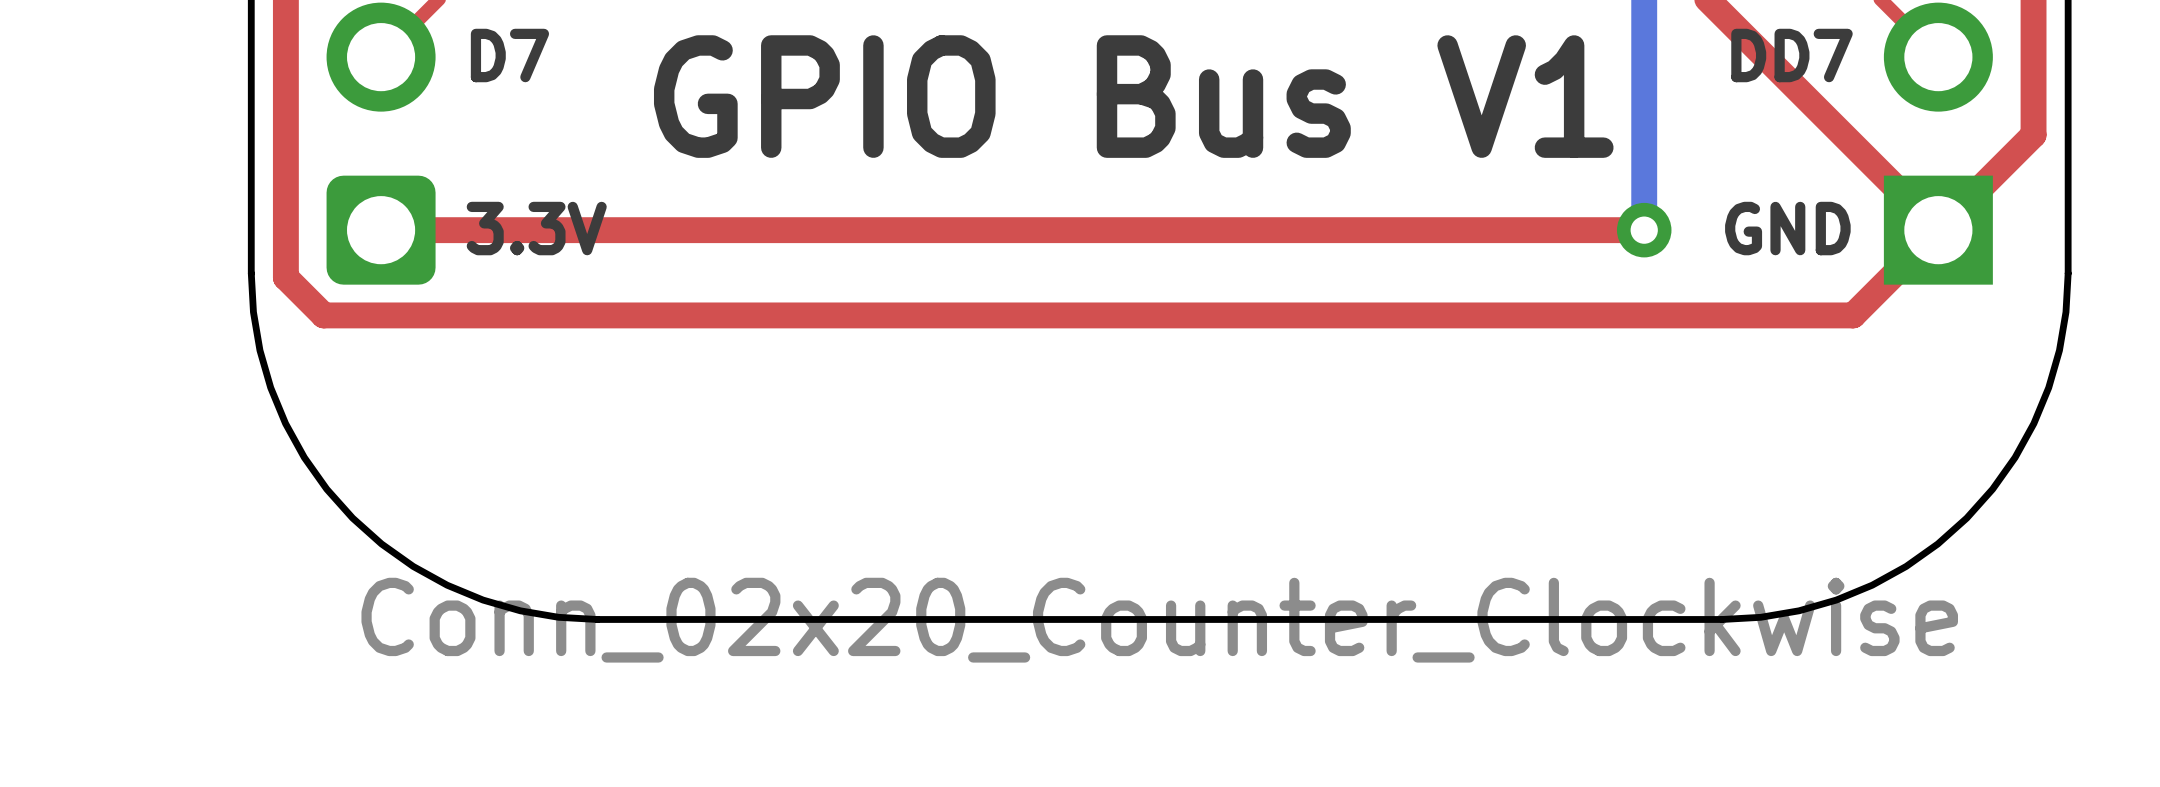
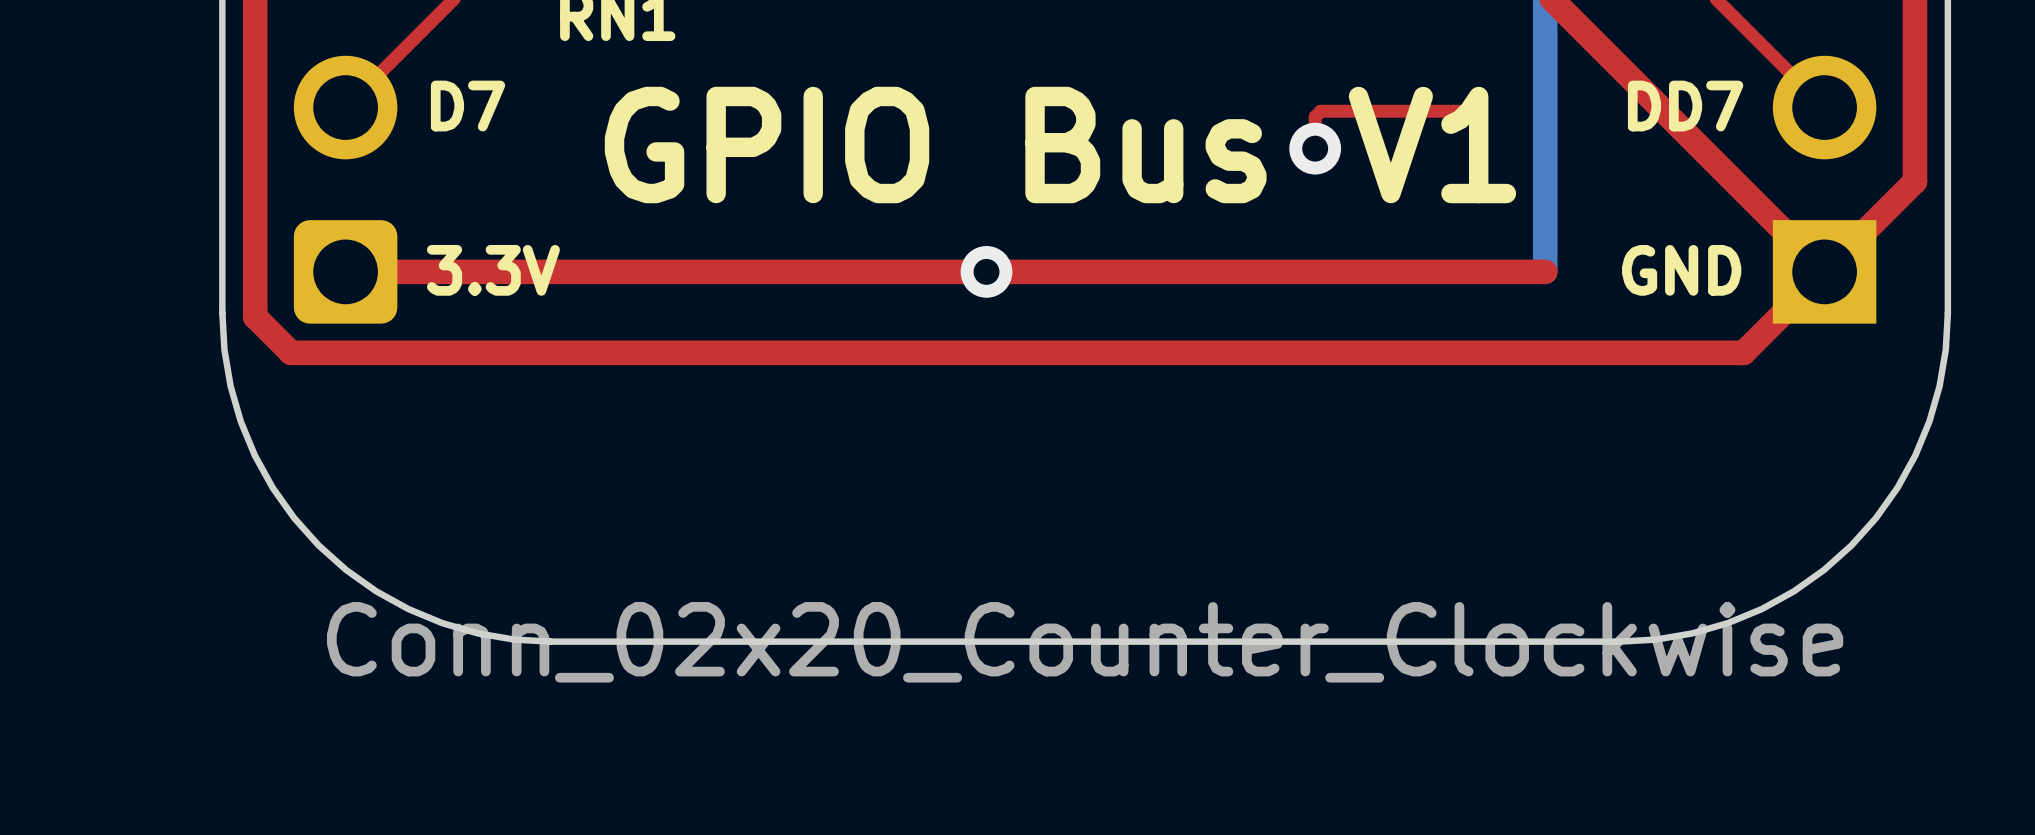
top track: none -> (1475, 111) (1320, 111) (1315, 116) (1315, 148)
via: none -> (1315, 148)
via: none -> (986, 271)
via: (1644, 230) -> none

